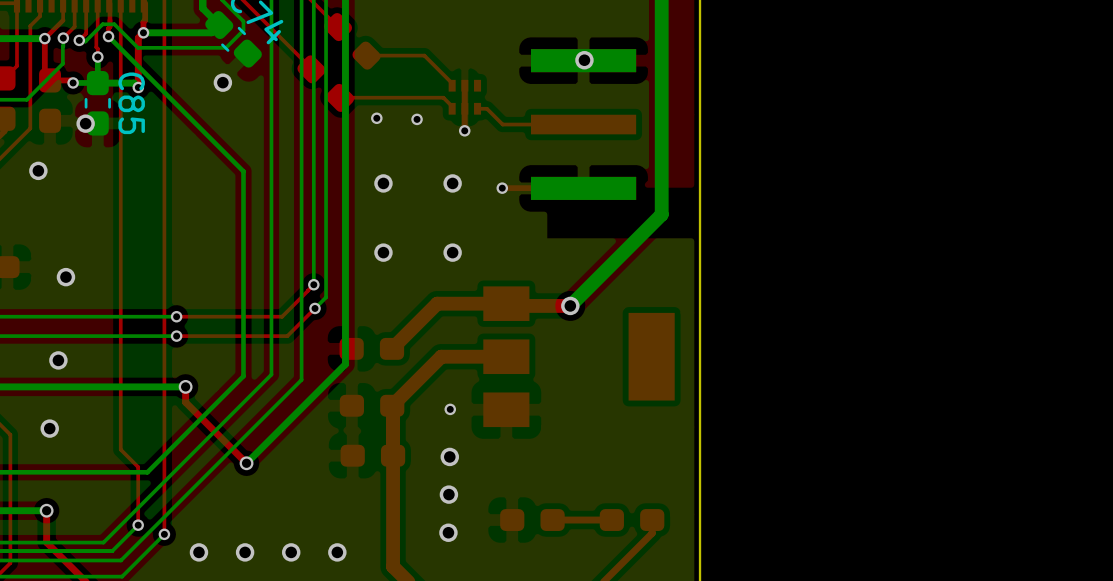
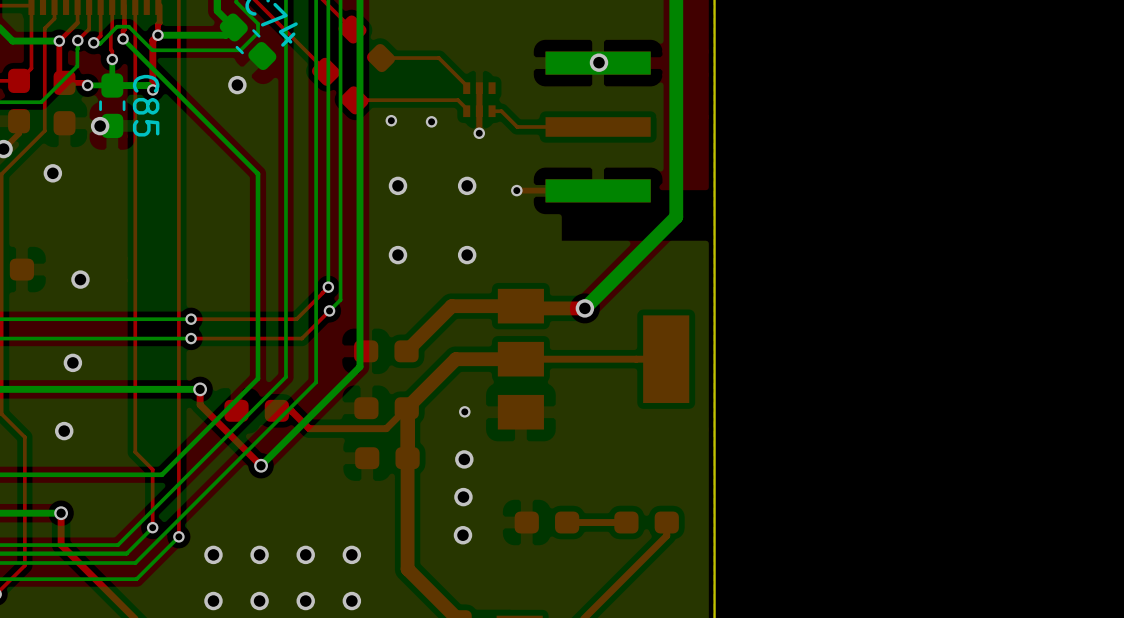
top track: none -> (666, 359) (520, 359)
top track: none -> (406, 408) (386, 428) (309, 428) (291, 410) (276, 410)
part: none -> (256, 410)

